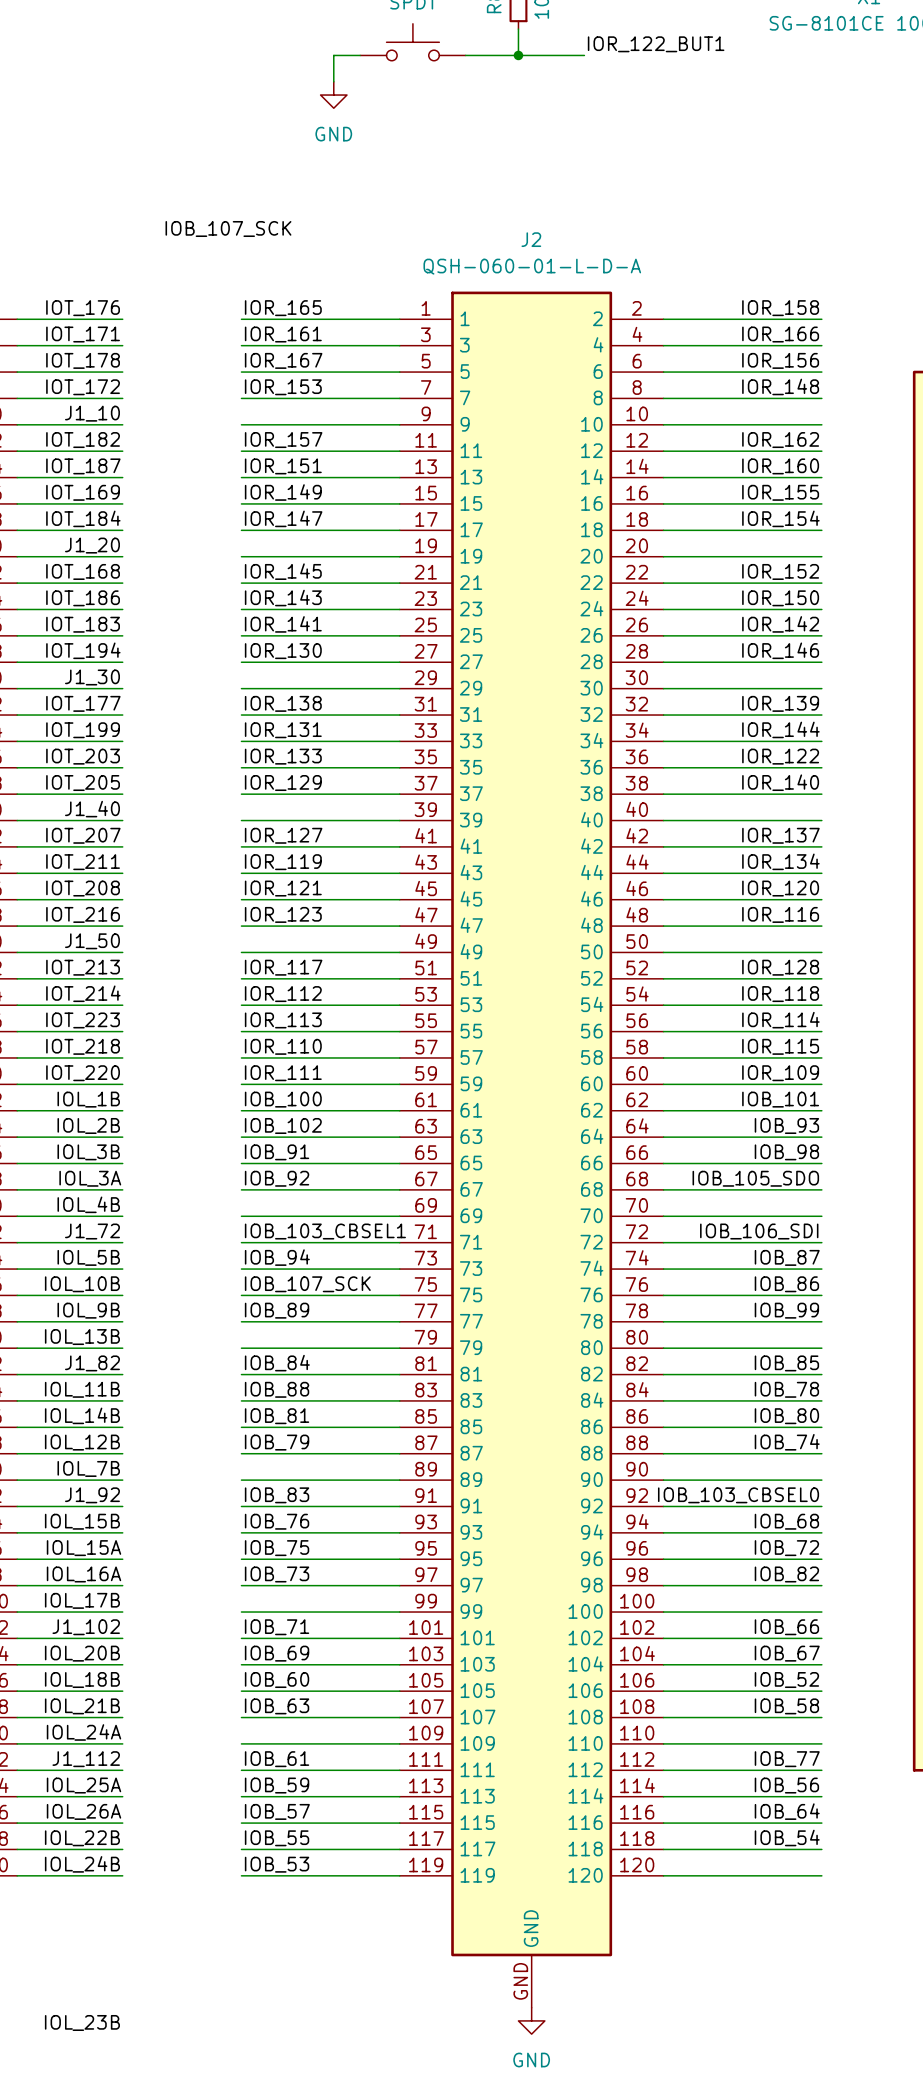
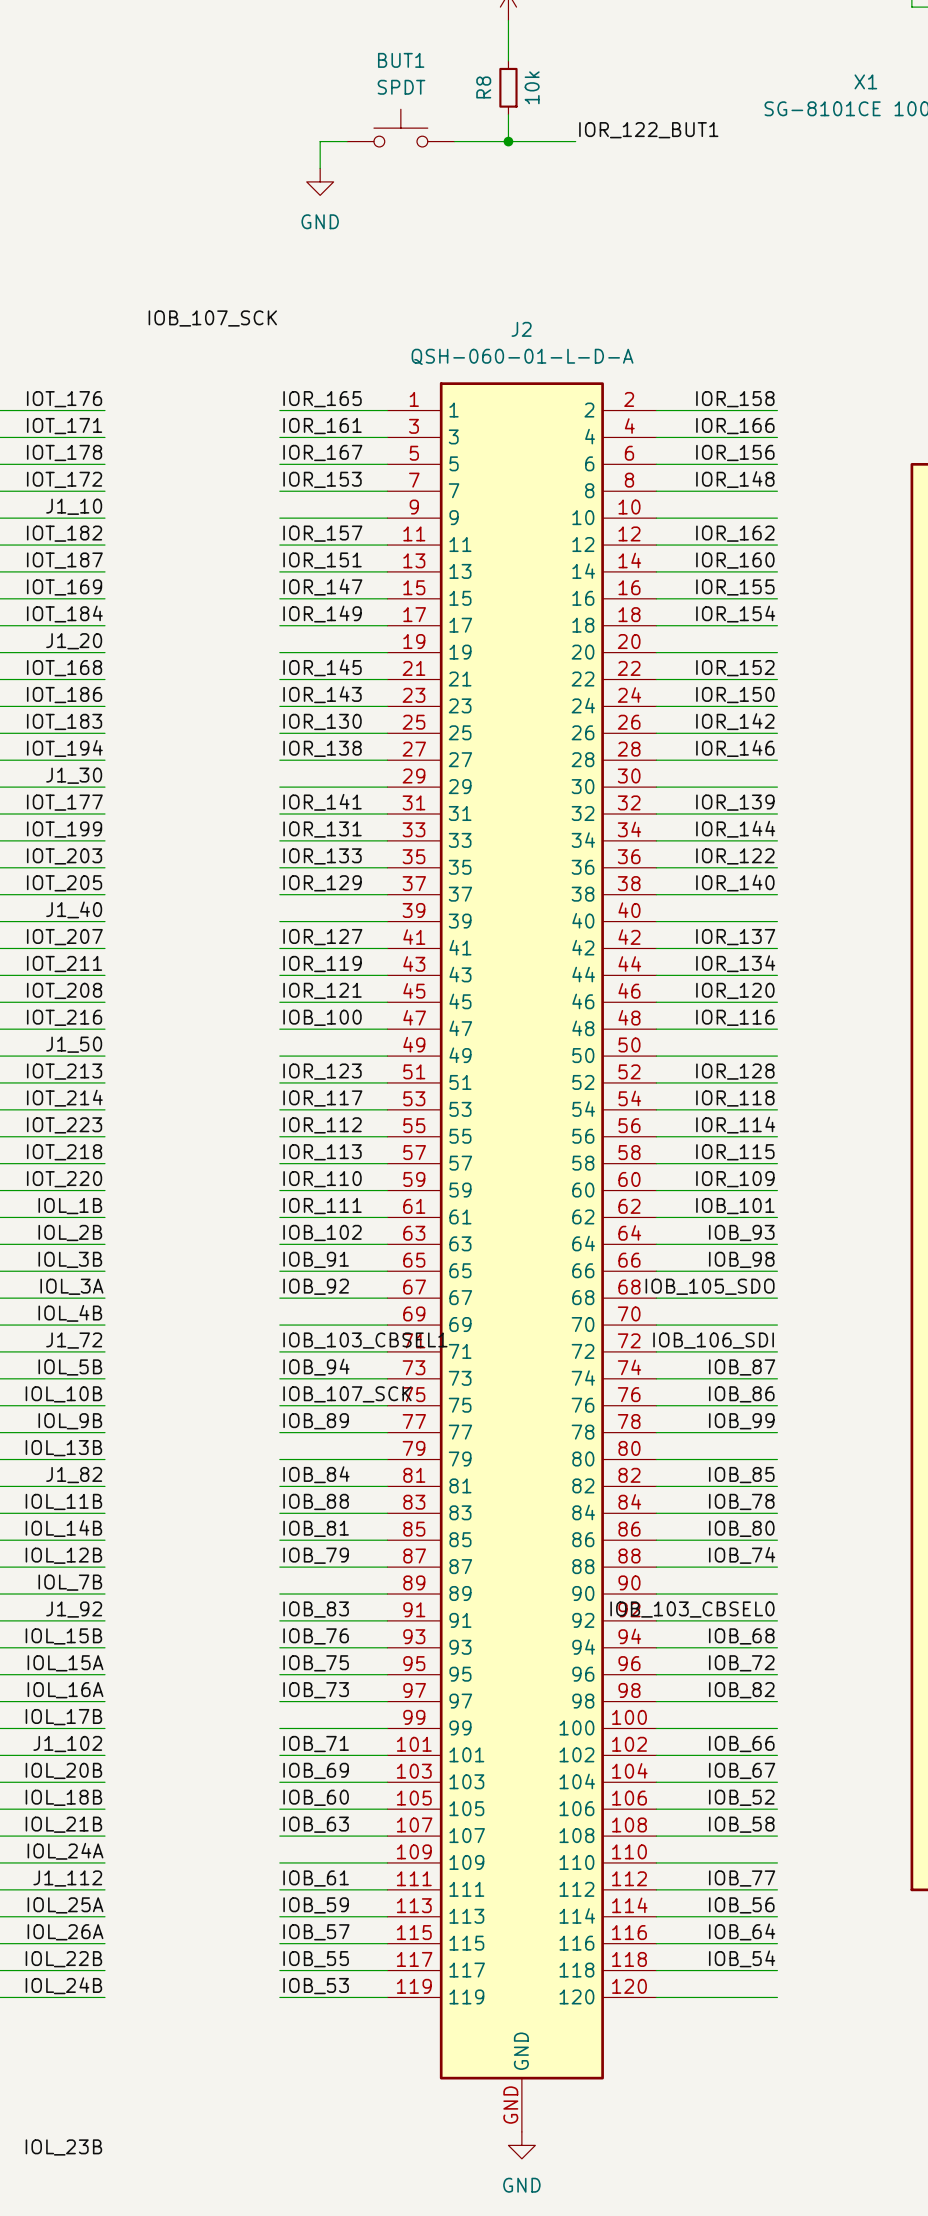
label position: IOR_165 (283, 308) -> IOR_165 (322, 399)
label position: IOR_158 (780, 308) -> IOR_158 (735, 399)
wire: (241, 319) (294, 319) -> none
wire: (782, 319) (821, 319) -> none
label position: IOR_161 (283, 334) -> IOR_161 (322, 426)
label position: IOR_166 (780, 334) -> IOR_166 (735, 426)
wire: (241, 345) (294, 345) -> none
wire: (782, 345) (821, 345) -> none
label position: IOR_167 (283, 360) -> IOR_167 (322, 452)
label position: IOR_156 (780, 360) -> IOR_156 (735, 452)
wire: (241, 372) (294, 372) -> none
wire: (782, 372) (821, 372) -> none
label position: IOR_148 (780, 386) -> IOR_148 (735, 479)
label position: IOR_153 (283, 387) -> IOR_153 (322, 479)
wire: (241, 398) (294, 398) -> none
wire: (782, 398) (821, 398) -> none
wire: (241, 424) (294, 424) -> none
wire: (782, 424) (821, 424) -> none
label position: IOR_157 (283, 440) -> IOR_157 (322, 533)
label position: IOR_162 (780, 440) -> IOR_162 (735, 533)
wire: (241, 451) (294, 451) -> none
wire: (782, 451) (821, 451) -> none
label position: IOR_151 (283, 466) -> IOR_151 (322, 560)
label position: IOR_160 (780, 466) -> IOR_160 (735, 560)
wire: (241, 477) (294, 477) -> none
wire: (782, 477) (821, 477) -> none
label position: IOR_149 (283, 492) -> IOR_149 (322, 614)
label position: IOR_155 (780, 492) -> IOR_155 (735, 587)
wire: (241, 503) (294, 503) -> none
wire: (782, 503) (821, 503) -> none
label position: IOR_147 (283, 518) -> IOR_147 (322, 587)
label position: IOR_154 (780, 518) -> IOR_154 (735, 614)
wire: (241, 530) (294, 530) -> none
wire: (782, 530) (821, 530) -> none
wire: (241, 556) (294, 556) -> none
wire: (782, 556) (821, 556) -> none
label position: IOR_145 (283, 571) -> IOR_145 (322, 667)
label position: IOR_152 (780, 571) -> IOR_152 (735, 668)
wire: (241, 583) (294, 583) -> none
wire: (782, 583) (821, 583) -> none
label position: IOR_143 (283, 598) -> IOR_143 (322, 694)
label position: IOR_150 (780, 598) -> IOR_150 (735, 695)
wire: (241, 609) (294, 609) -> none
wire: (782, 609) (821, 609) -> none
label position: IOR_141 (283, 624) -> IOR_141 (322, 802)
label position: IOR_142 (780, 624) -> IOR_142 (735, 721)
wire: (241, 635) (294, 635) -> none
wire: (782, 635) (821, 635) -> none
label position: IOR_146 (780, 650) -> IOR_146 (735, 748)
label position: IOR_130 (283, 651) -> IOR_130 (322, 721)
wire: (241, 662) (294, 662) -> none
wire: (782, 662) (821, 662) -> none
wire: (241, 688) (294, 688) -> none
wire: (782, 688) (821, 688) -> none
label position: IOR_138 (283, 703) -> IOR_138 (322, 748)
label position: IOR_139 (780, 703) -> IOR_139 (735, 802)
wire: (241, 715) (294, 715) -> none
wire: (782, 715) (821, 715) -> none
label position: IOR_144 (780, 729) -> IOR_144 (735, 829)
label position: IOR_131 (283, 730) -> IOR_131 (322, 829)
wire: (241, 741) (294, 741) -> none
wire: (782, 741) (821, 741) -> none
label position: IOR_133 (283, 756) -> IOR_133 (322, 856)
label position: IOR_122 (780, 756) -> IOR_122 (735, 856)
wire: (241, 767) (294, 767) -> none
wire: (782, 767) (821, 767) -> none
label position: IOR_140 (780, 782) -> IOR_140 (735, 883)
label position: IOR_129 (283, 783) -> IOR_129 (322, 883)
wire: (241, 794) (294, 794) -> none
wire: (782, 794) (821, 794) -> none
wire: (241, 820) (294, 820) -> none
wire: (782, 820) (821, 820) -> none
label position: IOR_127 (283, 835) -> IOR_127 (322, 937)
label position: IOR_137 (780, 835) -> IOR_137 (735, 937)
wire: (241, 846) (294, 846) -> none
wire: (782, 846) (821, 846) -> none
label position: IOR_134 (780, 861) -> IOR_134 (735, 963)
label position: IOR_119 (283, 862) -> IOR_119 (322, 964)
wire: (241, 873) (294, 873) -> none
wire: (782, 873) (821, 873) -> none
label position: IOR_121 (283, 888) -> IOR_121 (322, 990)
label position: IOR_120 (780, 888) -> IOR_120 (735, 990)
wire: (241, 899) (294, 899) -> none
wire: (782, 899) (821, 899) -> none
label position: IOR_123 (283, 914) -> IOR_123 (322, 1071)
label position: IOR_116 (780, 914) -> IOR_116 (735, 1017)
wire: (241, 926) (294, 926) -> none
wire: (782, 926) (821, 926) -> none
wire: (241, 952) (294, 952) -> none
wire: (782, 952) (821, 952) -> none
label position: IOR_117 (283, 967) -> IOR_117 (322, 1098)
label position: IOR_128 (780, 967) -> IOR_128 (735, 1071)
wire: (241, 978) (294, 978) -> none
wire: (782, 978) (821, 978) -> none
label position: IOR_112 (283, 994) -> IOR_112 (322, 1125)
label position: IOR_118 (780, 994) -> IOR_118 (735, 1098)
wire: (241, 1005) (294, 1005) -> none
wire: (782, 1005) (821, 1005) -> none
label position: IOR_113 (283, 1020) -> IOR_113 (322, 1152)
label position: IOR_114 (780, 1020) -> IOR_114 (735, 1125)
wire: (241, 1031) (294, 1031) -> none
wire: (782, 1031) (821, 1031) -> none
label position: IOR_110 (283, 1046) -> IOR_110 (322, 1179)
label position: IOR_115 (780, 1046) -> IOR_115 (735, 1152)
wire: (241, 1057) (294, 1057) -> none
wire: (782, 1057) (821, 1057) -> none
label position: IOR_111 (283, 1073) -> IOR_111 (322, 1206)
label position: IOR_109 (780, 1073) -> IOR_109 (735, 1179)
wire: (241, 1084) (294, 1084) -> none
wire: (782, 1084) (821, 1084) -> none
label position: IOB_100 (283, 1099) -> IOB_100 (322, 1017)
label position: IOB_101 (780, 1099) -> IOB_101 (735, 1206)
wire: (241, 1110) (294, 1110) -> none
wire: (782, 1110) (821, 1110) -> none
label position: IOB_102 (283, 1125) -> IOB_102 (322, 1232)
label position: IOB_93 (786, 1125) -> IOB_93 (741, 1232)
wire: (241, 1137) (294, 1137) -> none
wire: (782, 1137) (821, 1137) -> none
label position: IOB_91 (277, 1152) -> IOB_91 (316, 1259)
label position: IOB_98 (786, 1152) -> IOB_98 (741, 1259)
wire: (241, 1163) (294, 1163) -> none
wire: (782, 1163) (821, 1163) -> none
label position: IOB_92 (277, 1178) -> IOB_92 (316, 1286)
label position: IOB_105_SDO (755, 1178) -> IOB_105_SDO (710, 1286)
wire: (241, 1189) (294, 1189) -> none
wire: (782, 1189) (821, 1189) -> none
wire: (241, 1216) (294, 1216) -> none
wire: (782, 1216) (821, 1216) -> none
label position: IOB_103_CBSEL1 (325, 1231) -> IOB_103_CBSEL1 (365, 1340)
label position: IOB_106_SDI (759, 1231) -> IOB_106_SDI (713, 1340)
wire: (241, 1242) (294, 1242) -> none
wire: (782, 1242) (821, 1242) -> none
label position: IOB_94 (277, 1257) -> IOB_94 (316, 1367)
label position: IOB_87 (787, 1257) -> IOB_87 (742, 1367)
wire: (241, 1269) (294, 1269) -> none
wire: (782, 1269) (821, 1269) -> none
label position: IOB_107_SCK (307, 1284) -> IOB_107_SCK (347, 1394)
label position: IOB_86 (786, 1284) -> IOB_86 (741, 1394)
wire: (241, 1295) (294, 1295) -> none
wire: (782, 1295) (821, 1295) -> none
label position: IOB_89 (277, 1310) -> IOB_89 (316, 1421)
label position: IOB_99 (786, 1310) -> IOB_99 (741, 1421)
wire: (241, 1321) (294, 1321) -> none
wire: (782, 1321) (821, 1321) -> none
wire: (241, 1348) (294, 1348) -> none
wire: (782, 1348) (821, 1348) -> none
label position: IOB_84 (277, 1363) -> IOB_84 (316, 1474)
label position: IOB_85 (786, 1363) -> IOB_85 (741, 1475)
wire: (241, 1374) (294, 1374) -> none
wire: (782, 1374) (821, 1374) -> none
label position: IOB_88 (277, 1389) -> IOB_88 (316, 1501)
label position: IOB_78 (786, 1389) -> IOB_78 (741, 1501)
wire: (241, 1400) (294, 1400) -> none
wire: (782, 1400) (821, 1400) -> none
label position: IOB_81 (277, 1416) -> IOB_81 (316, 1528)
label position: IOB_80 (786, 1416) -> IOB_80 (741, 1528)
wire: (241, 1427) (294, 1427) -> none
wire: (782, 1427) (821, 1427) -> none
label position: IOB_79 (277, 1442) -> IOB_79 (316, 1555)
label position: IOB_74 (787, 1442) -> IOB_74 (742, 1555)
wire: (241, 1453) (294, 1453) -> none
wire: (782, 1453) (821, 1453) -> none
wire: (241, 1480) (294, 1480) -> none
wire: (782, 1480) (821, 1480) -> none
label position: IOB_83 (277, 1495) -> IOB_83 (316, 1609)
label position: IOB_103_CBSEL0 (738, 1495) -> IOB_103_CBSEL0 (692, 1609)
wire: (241, 1506) (294, 1506) -> none
wire: (782, 1506) (821, 1506) -> none
label position: IOB_76 (277, 1521) -> IOB_76 (316, 1636)
label position: IOB_68 (786, 1521) -> IOB_68 (741, 1636)
wire: (241, 1532) (294, 1532) -> none
wire: (782, 1532) (821, 1532) -> none
label position: IOB_75 (277, 1548) -> IOB_75 (316, 1663)
label position: IOB_72 (786, 1548) -> IOB_72 (741, 1663)
wire: (241, 1559) (294, 1559) -> none
wire: (782, 1559) (821, 1559) -> none
label position: IOB_73 (277, 1574) -> IOB_73 (316, 1690)
label position: IOB_82 (786, 1574) -> IOB_82 (741, 1690)
wire: (241, 1585) (294, 1585) -> none
wire: (782, 1585) (821, 1585) -> none
wire: (241, 1612) (294, 1612) -> none
wire: (782, 1612) (821, 1612) -> none
label position: IOB_71 (277, 1627) -> IOB_71 (316, 1744)
label position: IOB_66 (786, 1627) -> IOB_66 (741, 1744)
wire: (241, 1638) (294, 1638) -> none
wire: (782, 1638) (821, 1638) -> none
label position: IOB_69 (277, 1653) -> IOB_69 (316, 1770)
label position: IOB_67 (787, 1653) -> IOB_67 (742, 1770)
wire: (241, 1664) (294, 1664) -> none
wire: (782, 1664) (821, 1664) -> none
label position: IOB_60 (277, 1680) -> IOB_60 (316, 1797)
label position: IOB_52 (786, 1680) -> IOB_52 (741, 1797)
wire: (241, 1691) (294, 1691) -> none
wire: (782, 1691) (821, 1691) -> none
label position: IOB_63 (277, 1706) -> IOB_63 (316, 1824)
label position: IOB_58 (786, 1706) -> IOB_58 (741, 1824)
wire: (241, 1717) (294, 1717) -> none
wire: (782, 1717) (821, 1717) -> none
wire: (241, 1743) (294, 1743) -> none
wire: (782, 1743) (821, 1743) -> none
label position: IOB_61 (277, 1759) -> IOB_61 (316, 1878)
label position: IOB_77 (787, 1759) -> IOB_77 (742, 1878)
wire: (241, 1770) (294, 1770) -> none
wire: (782, 1770) (821, 1770) -> none
label position: IOB_59 (277, 1785) -> IOB_59 (316, 1905)
label position: IOB_56 (786, 1785) -> IOB_56 (741, 1905)
wire: (241, 1796) (294, 1796) -> none
wire: (782, 1796) (821, 1796) -> none
label position: IOB_57 (277, 1811) -> IOB_57 (316, 1932)
label position: IOB_64 (787, 1811) -> IOB_64 (742, 1931)
wire: (241, 1823) (294, 1823) -> none
wire: (782, 1823) (821, 1823) -> none
label position: IOB_54 (787, 1837) -> IOB_54 (742, 1958)
label position: IOB_55 (277, 1838) -> IOB_55 (316, 1959)
wire: (241, 1849) (294, 1849) -> none
wire: (782, 1849) (821, 1849) -> none
label position: IOB_53 (277, 1864) -> IOB_53 (316, 1986)
wire: (241, 1875) (294, 1875) -> none
wire: (782, 1875) (821, 1875) -> none

